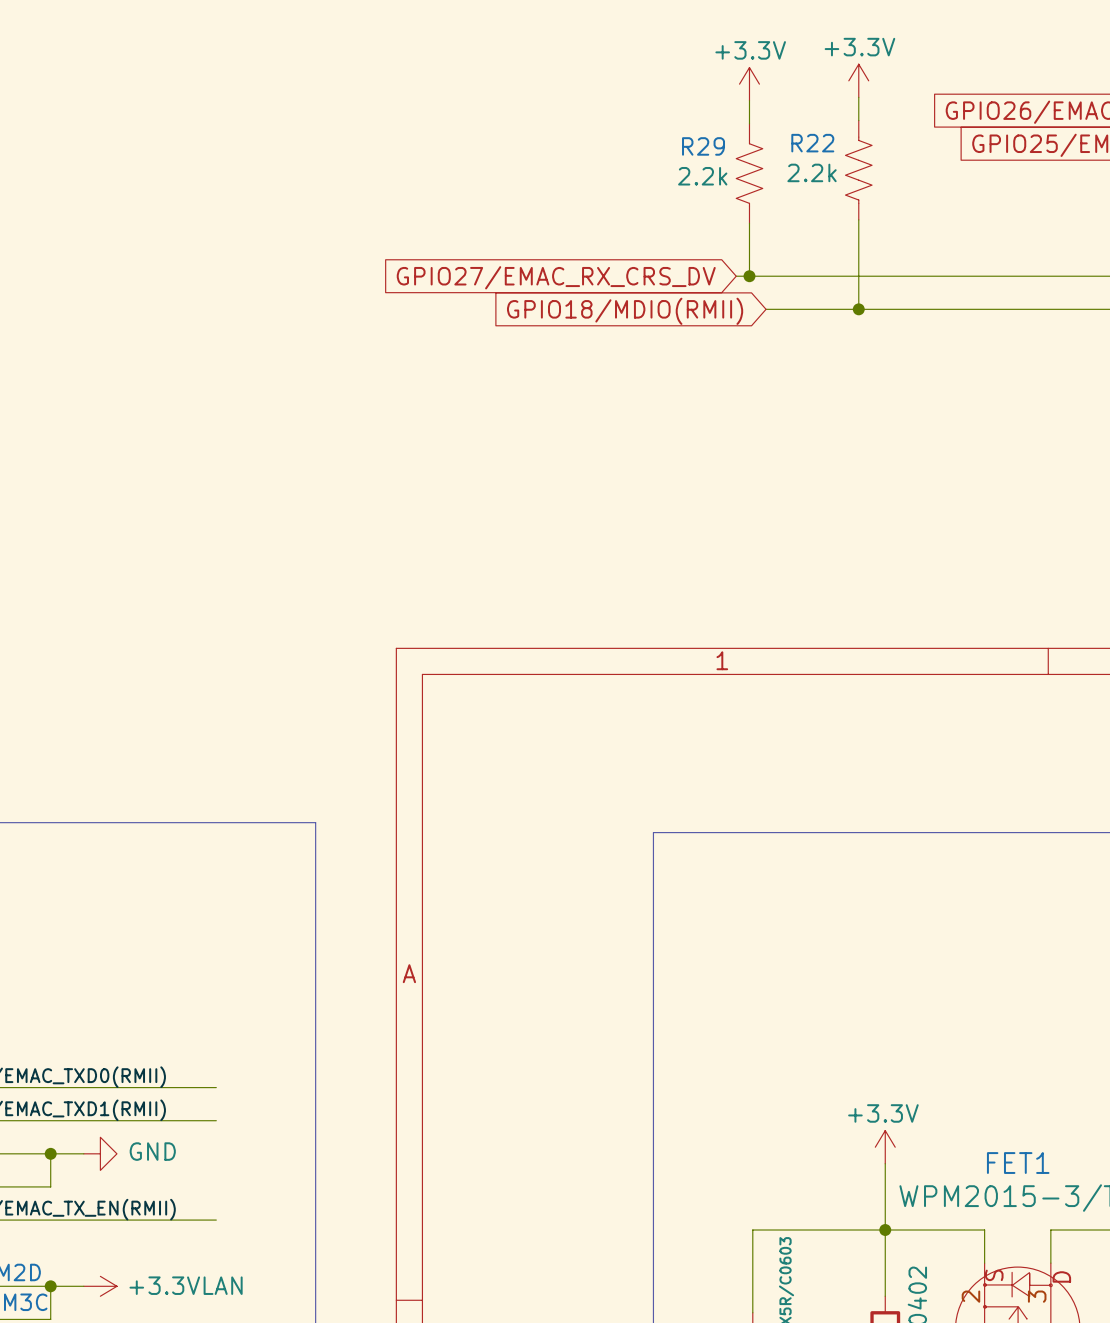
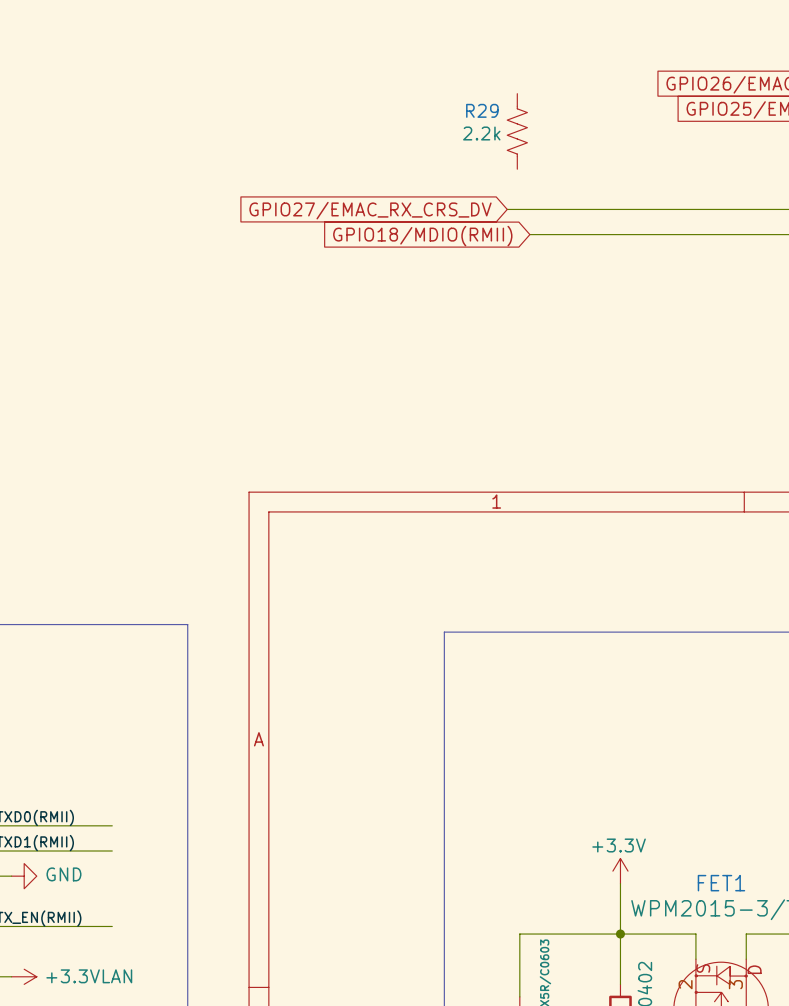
power symbol: +3.3V (858, 80) -> none
power symbol: +3.3V (749, 84) -> none
wire: (858, 97) (858, 120) -> none
wire: (749, 100) (749, 123) -> none
R22: 2.2k (858, 170) -> none
wire: (858, 219) (858, 309) -> none
wire: (749, 223) (749, 276) -> none
junction: (749, 276) -> none
junction: (858, 309) -> none

